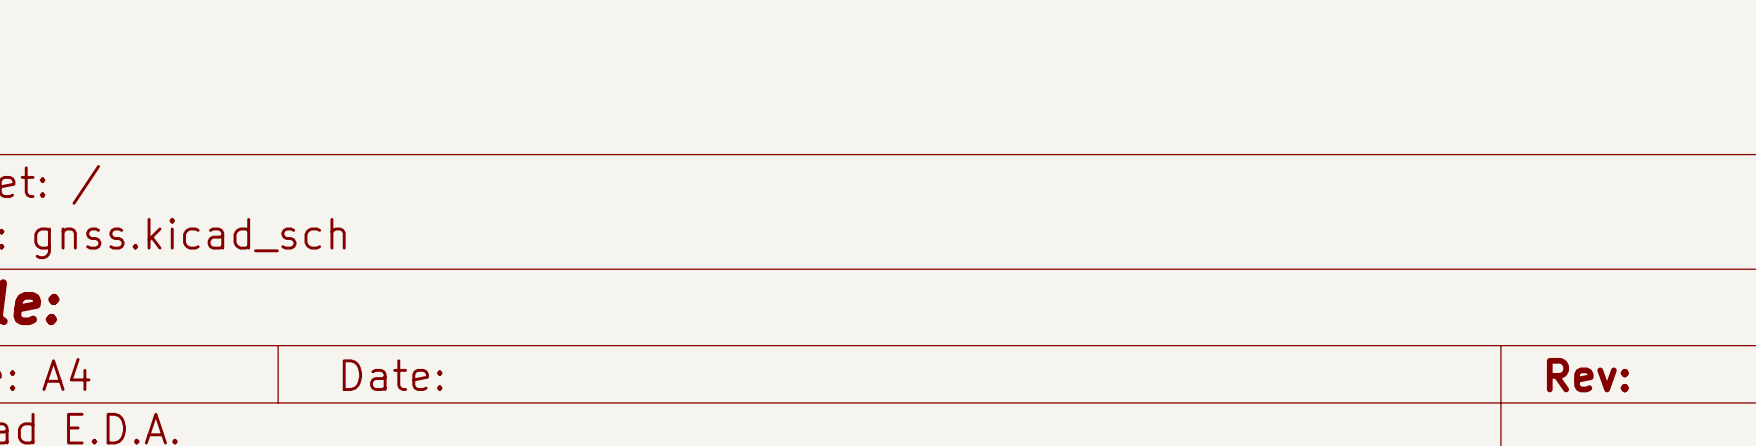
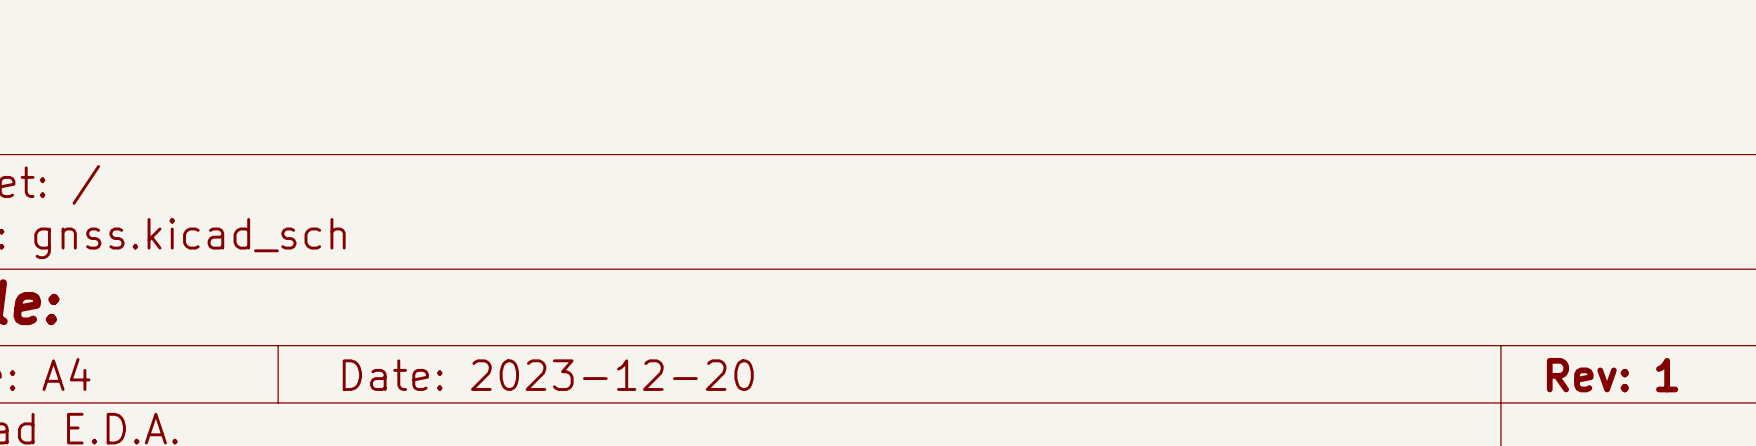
title block: Date: (392, 375) -> Date: 2023-12-20 (548, 375)
title block: Rev: (1587, 375) -> Rev: 1 (1612, 375)

